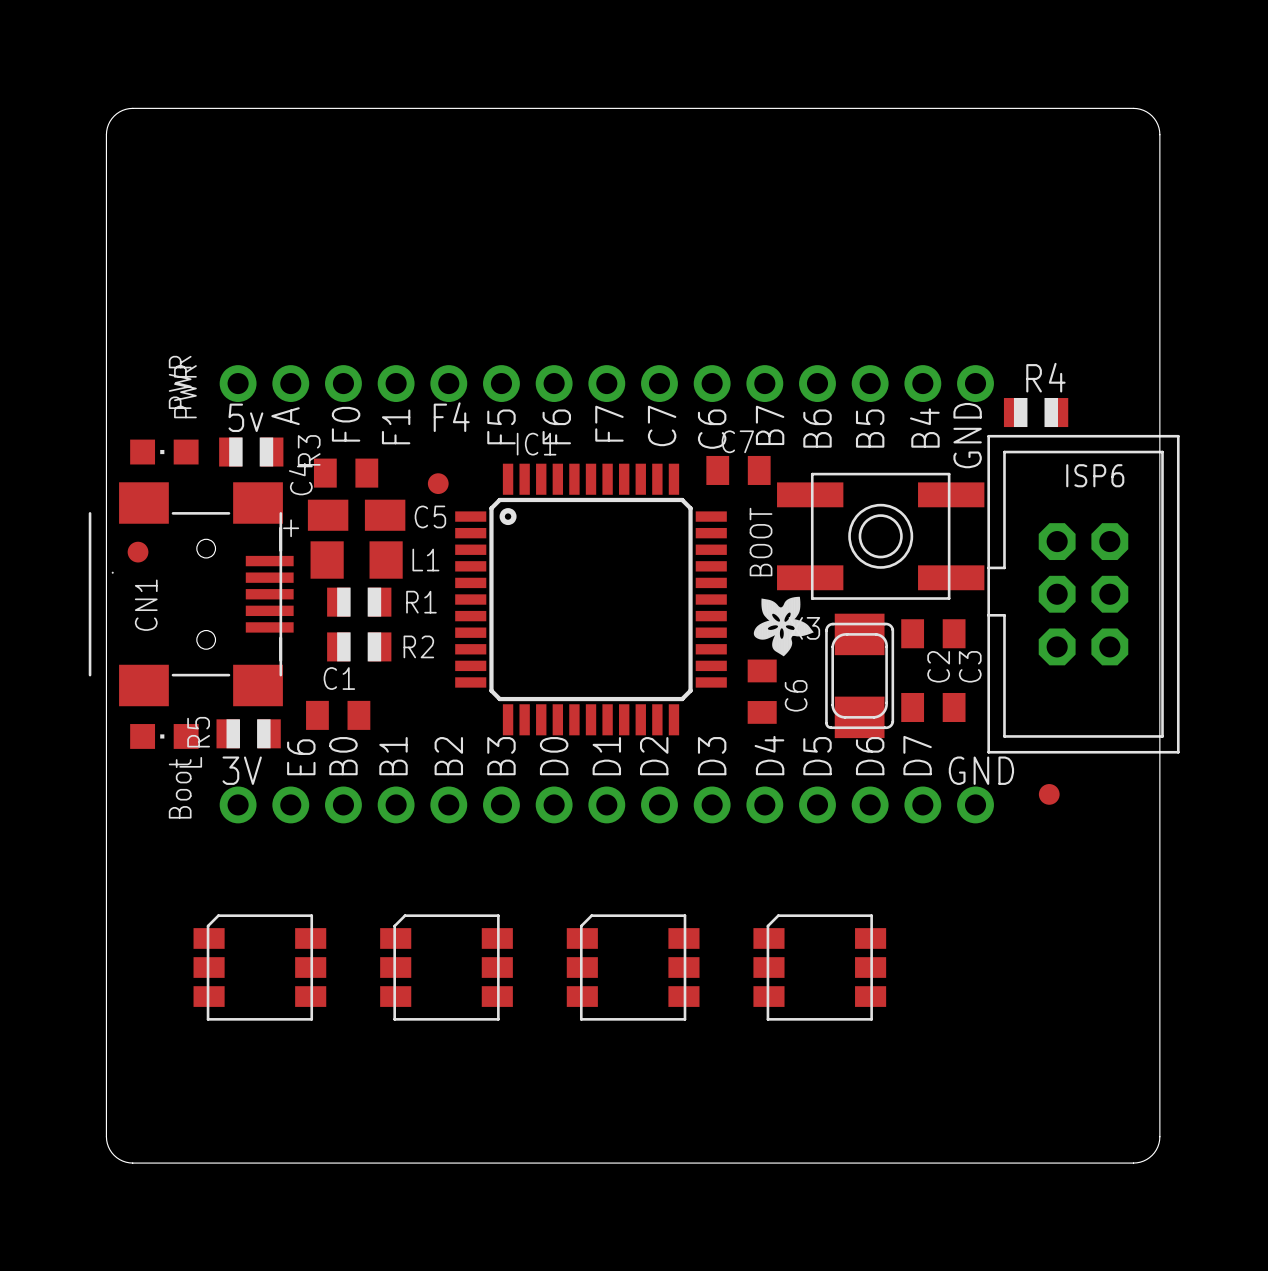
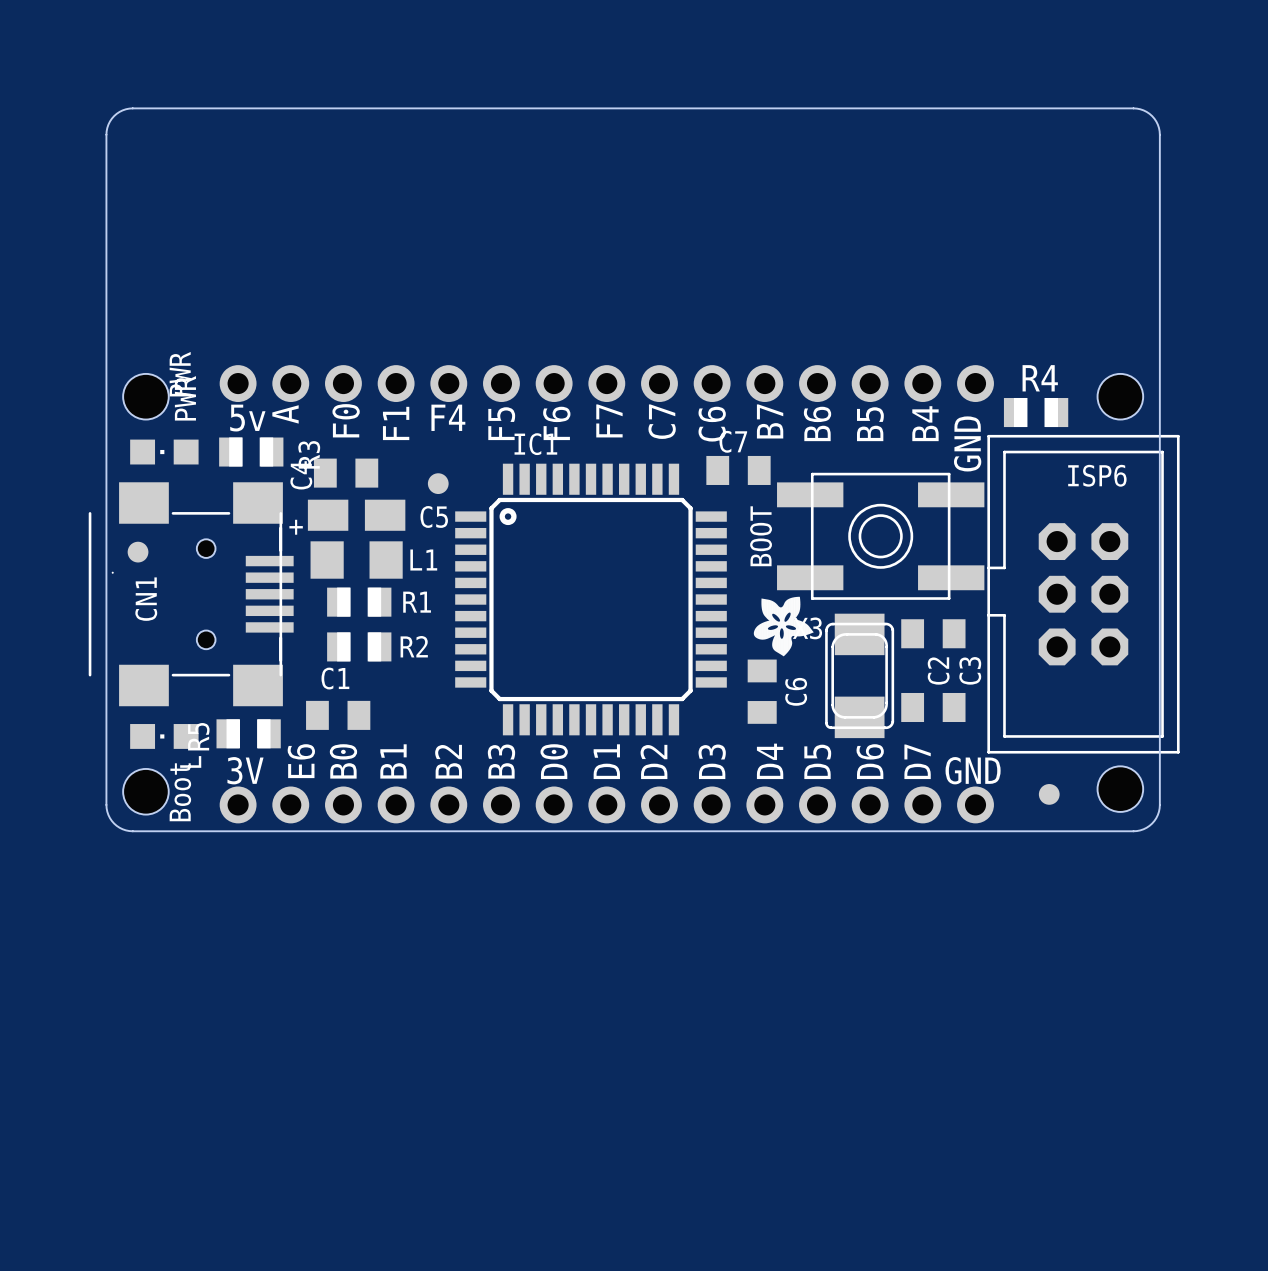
hole: none -> (145, 396)
hole: none -> (1120, 396)
hole: none -> (1120, 789)
hole: none -> (145, 791)
board edge: (106, 804) (106, 1140) (109, 1149) (116, 1157) (132, 1163) (1133, 1163) (1143, 1161) (1156, 1149) (1159, 1136) (1159, 804) -> (106, 804) (108, 815) (114, 823) (122, 829) (132, 831) (1133, 831) (1143, 829) (1152, 823) (1157, 815) (1159, 804)
part: (259, 967) -> none
part: (446, 967) -> none
part: (633, 967) -> none
part: (819, 967) -> none

